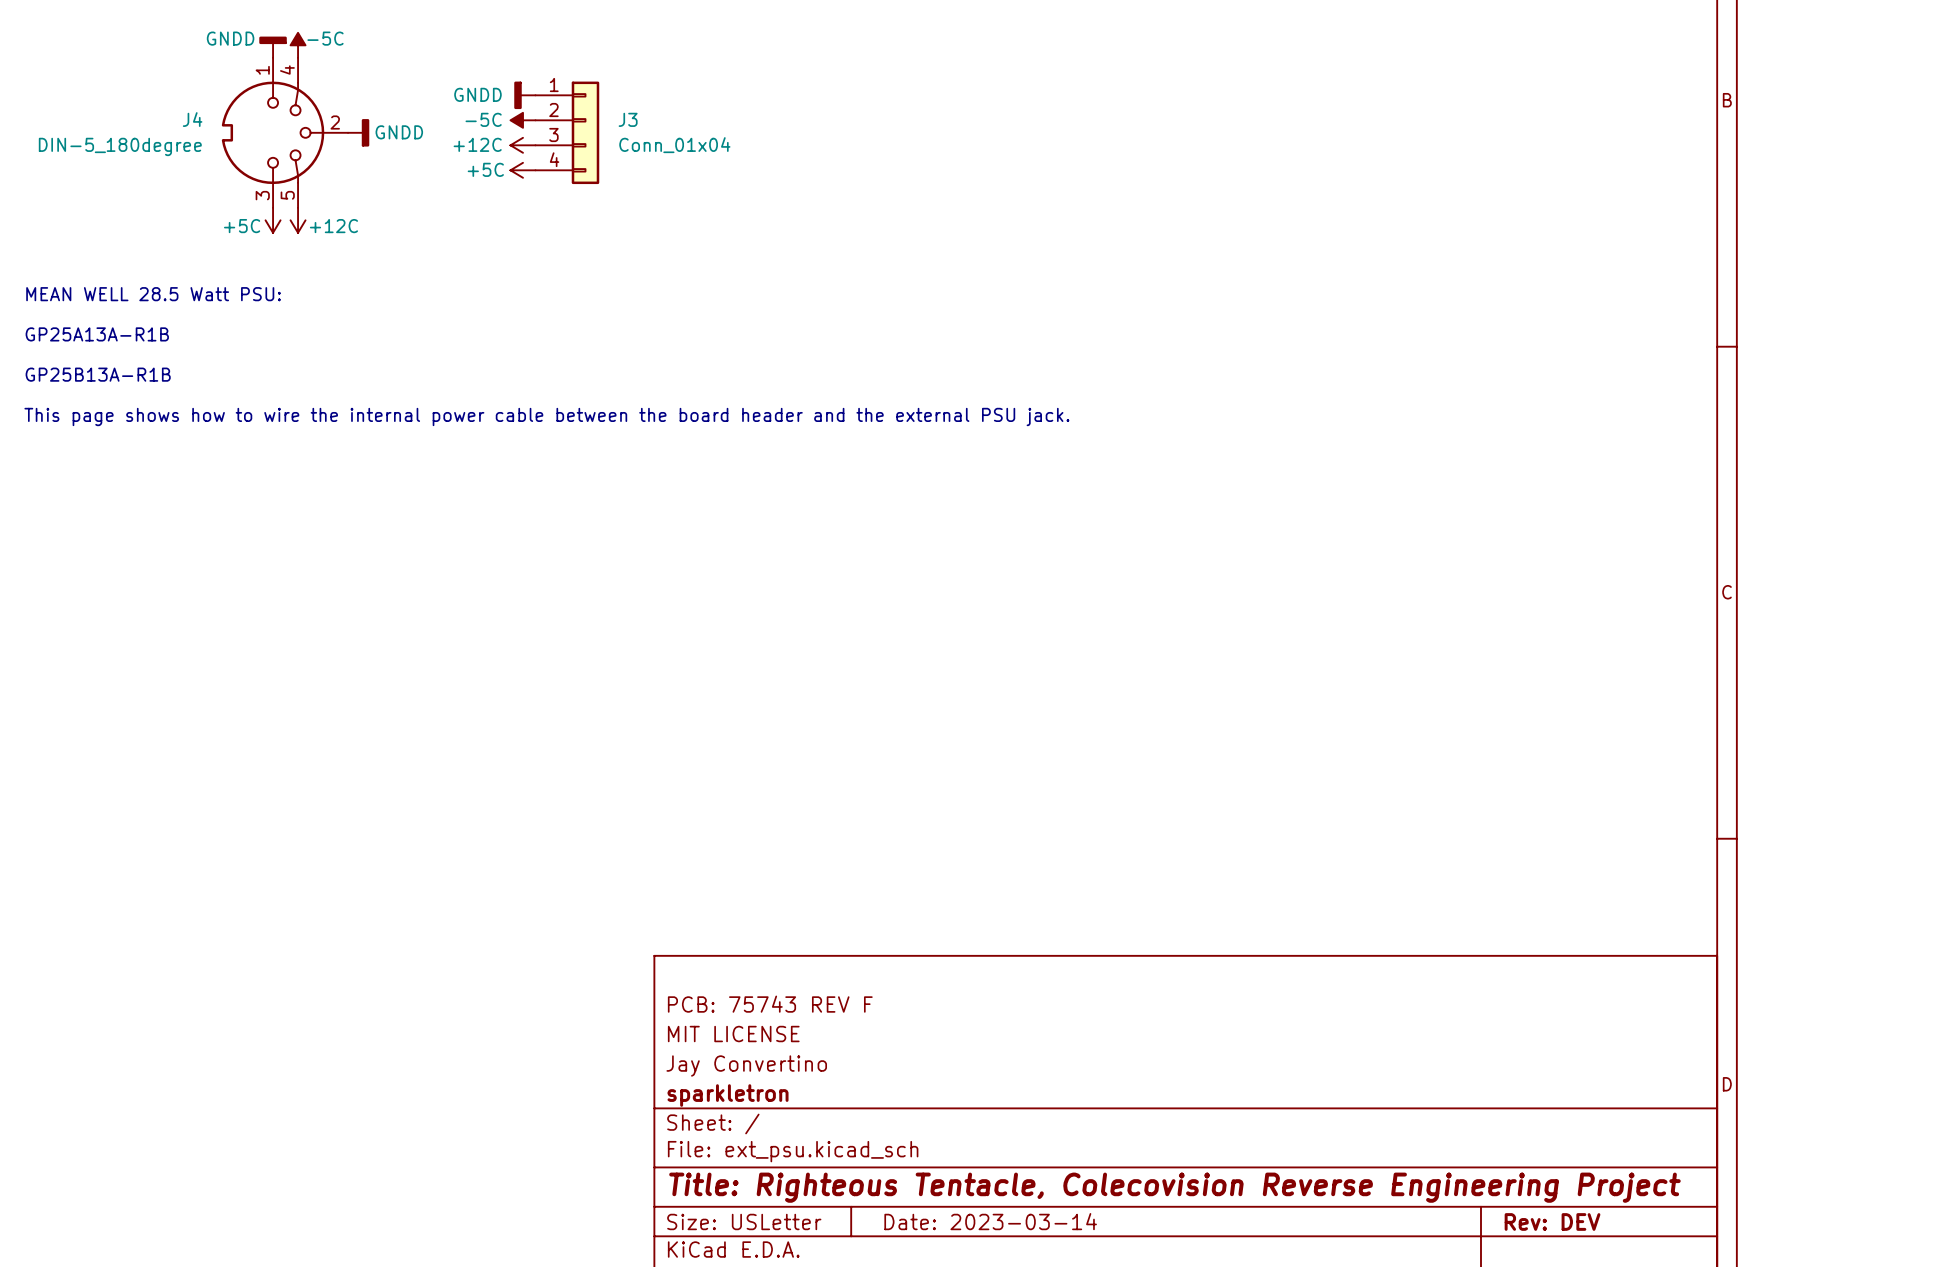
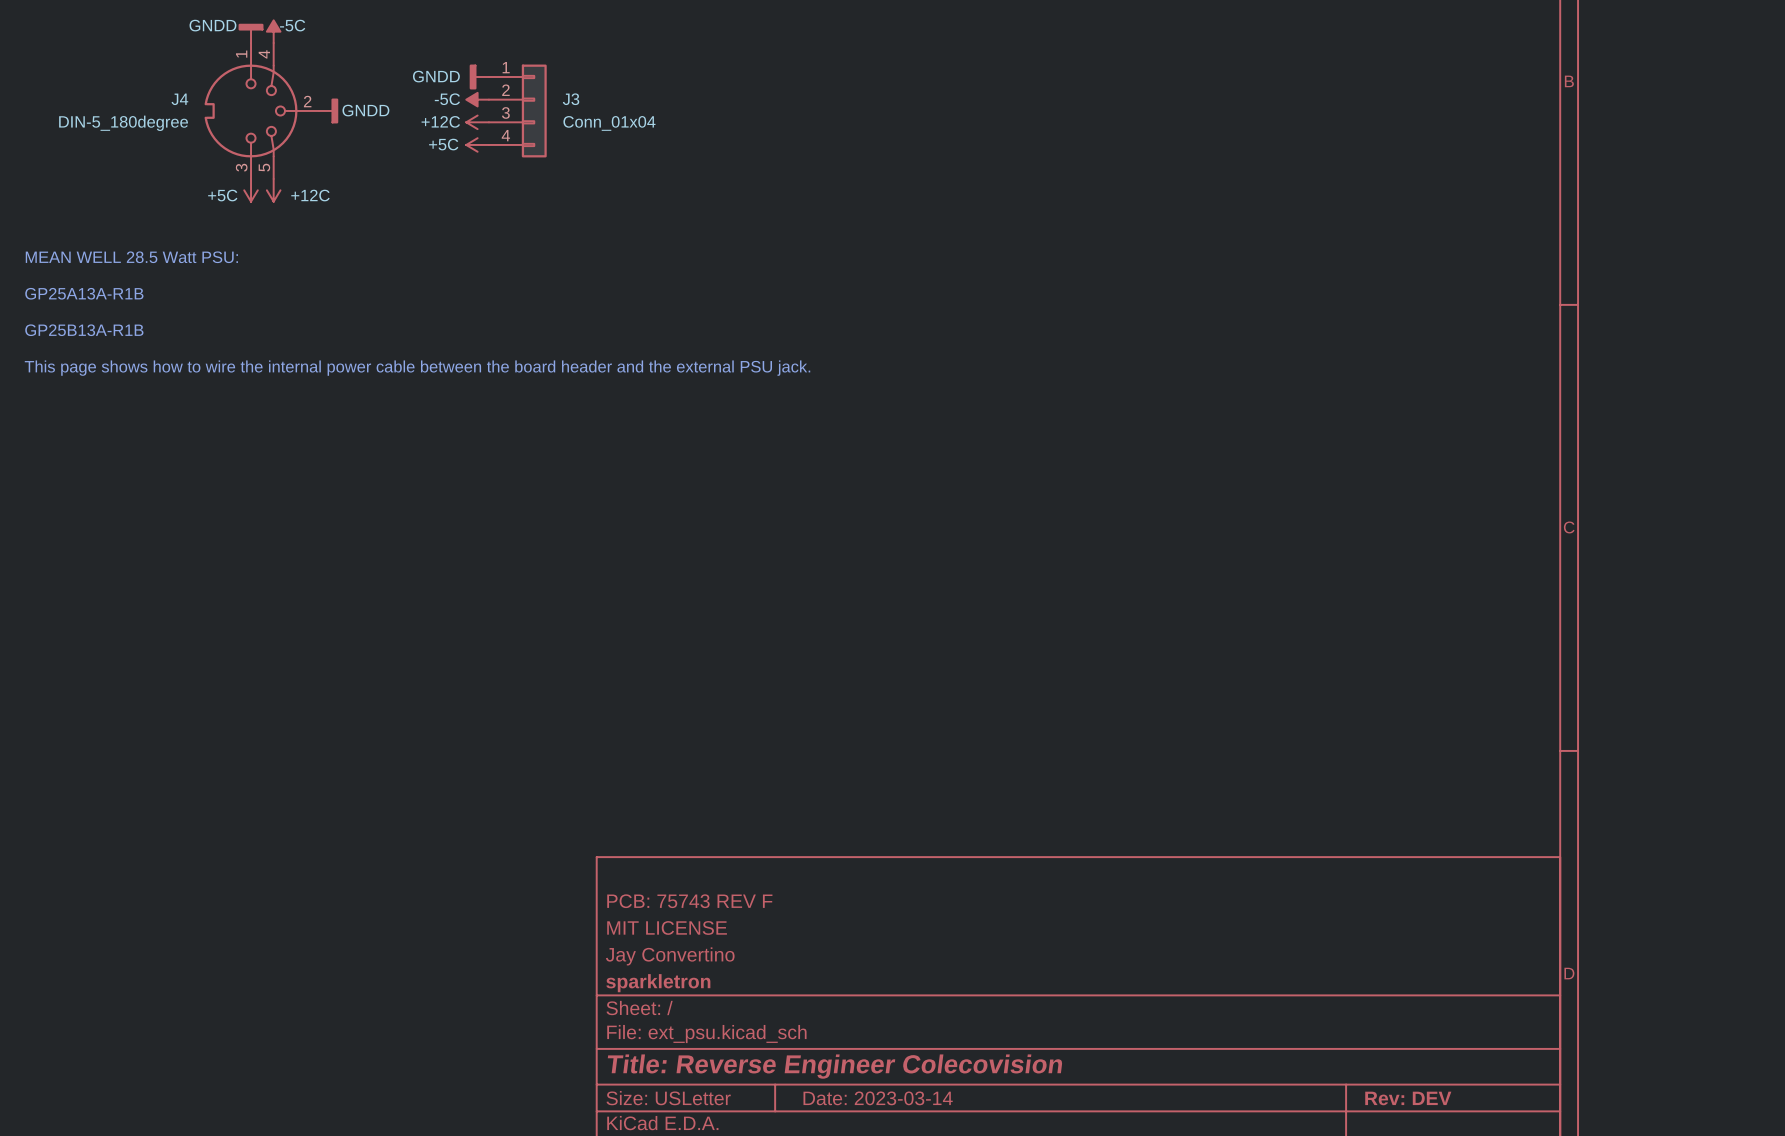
title block: Title: Righteous Tentacle, Colecovision Reverse Engineering Project (1174, 1187) -> Title: Reverse Engineer Colecovision (835, 1066)

